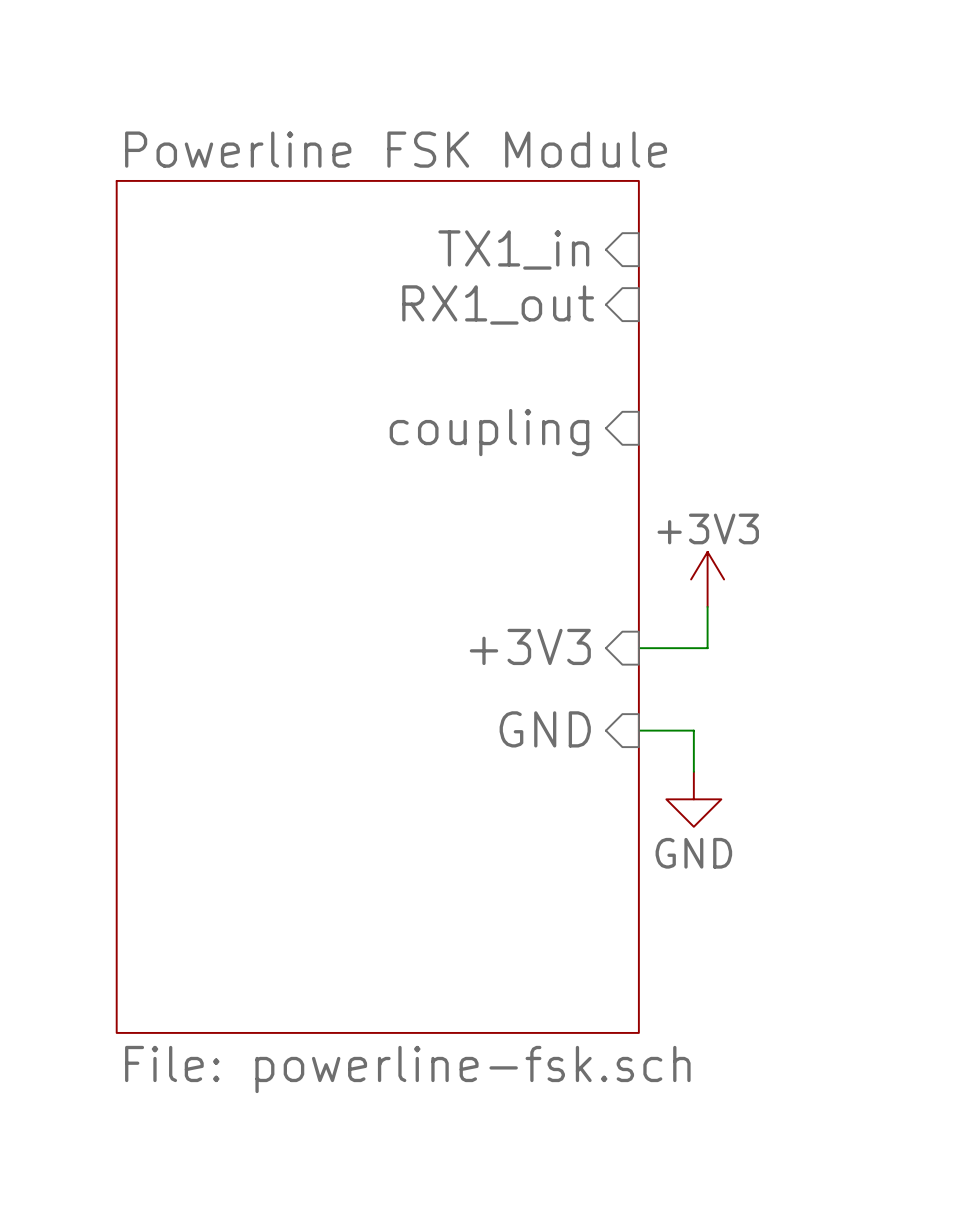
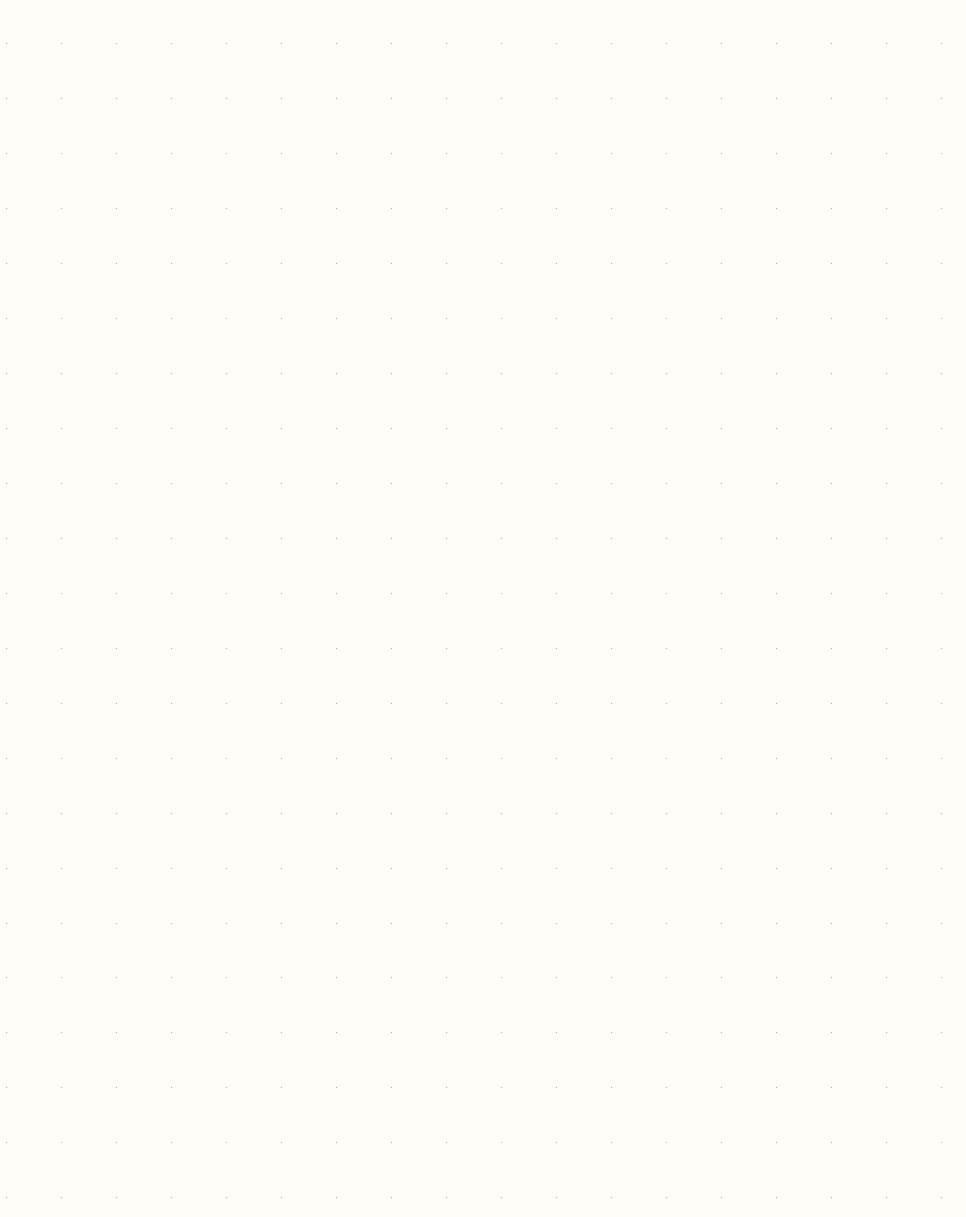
sheet pin: TX1_in (513, 249) -> none
sheet pin: RX1_out (498, 304) -> none
sheet pin: coupling (489, 432) -> none
power symbol: +3V3 (707, 579) -> none
sheet Powerline FSK Module: File: powerline-fsk.sch (377, 606) -> none
wire: (707, 606) (707, 648) (638, 648) -> none
sheet pin: +3V3 (530, 646) -> none
sheet pin: GND (545, 729) -> none
wire: (638, 730) (693, 730) (693, 771) -> none
power symbol: GND (693, 799) -> none

